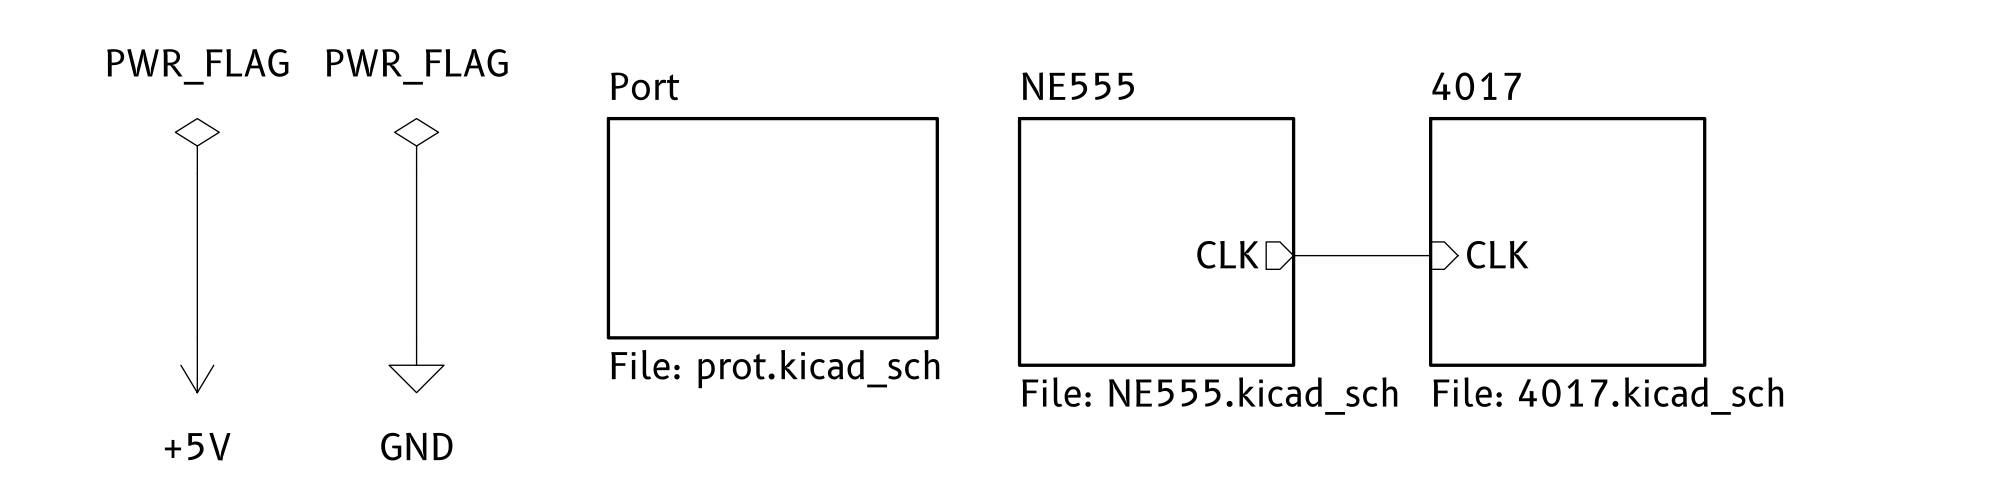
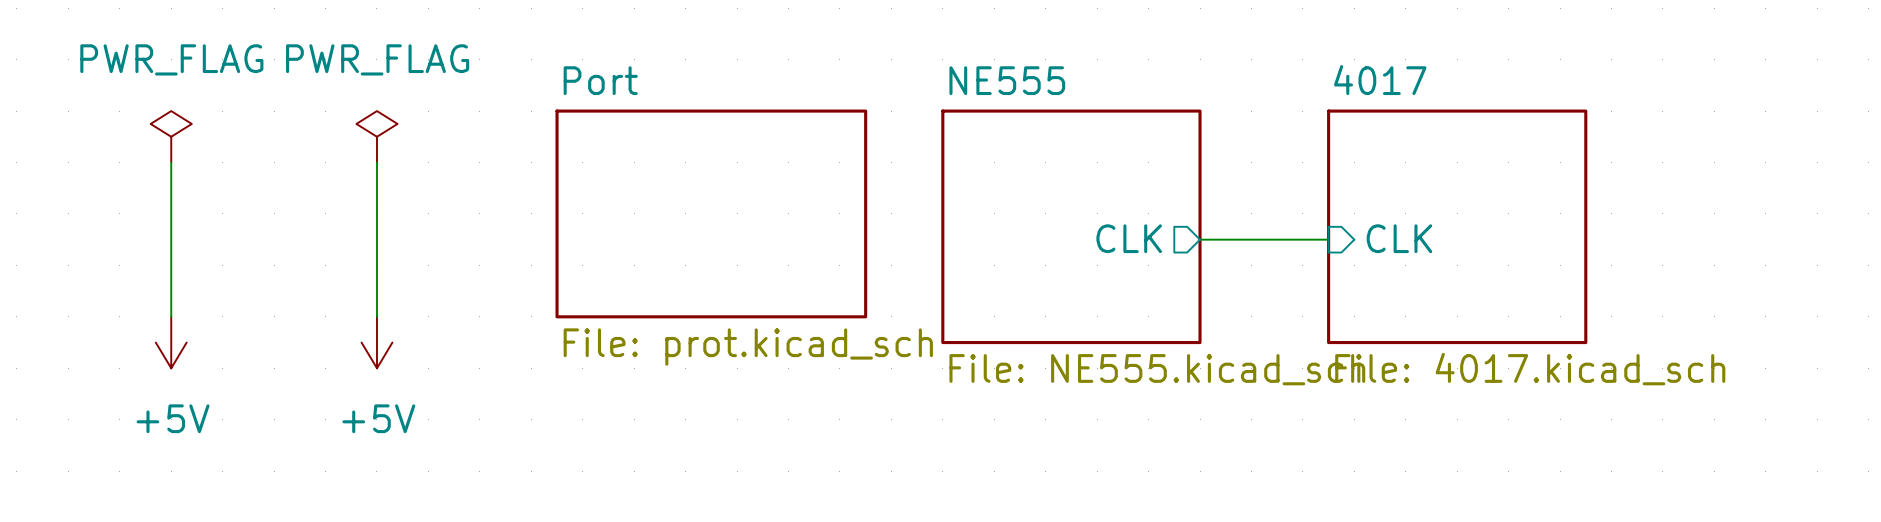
power symbol: GND (416, 365) -> +5V (376, 342)

